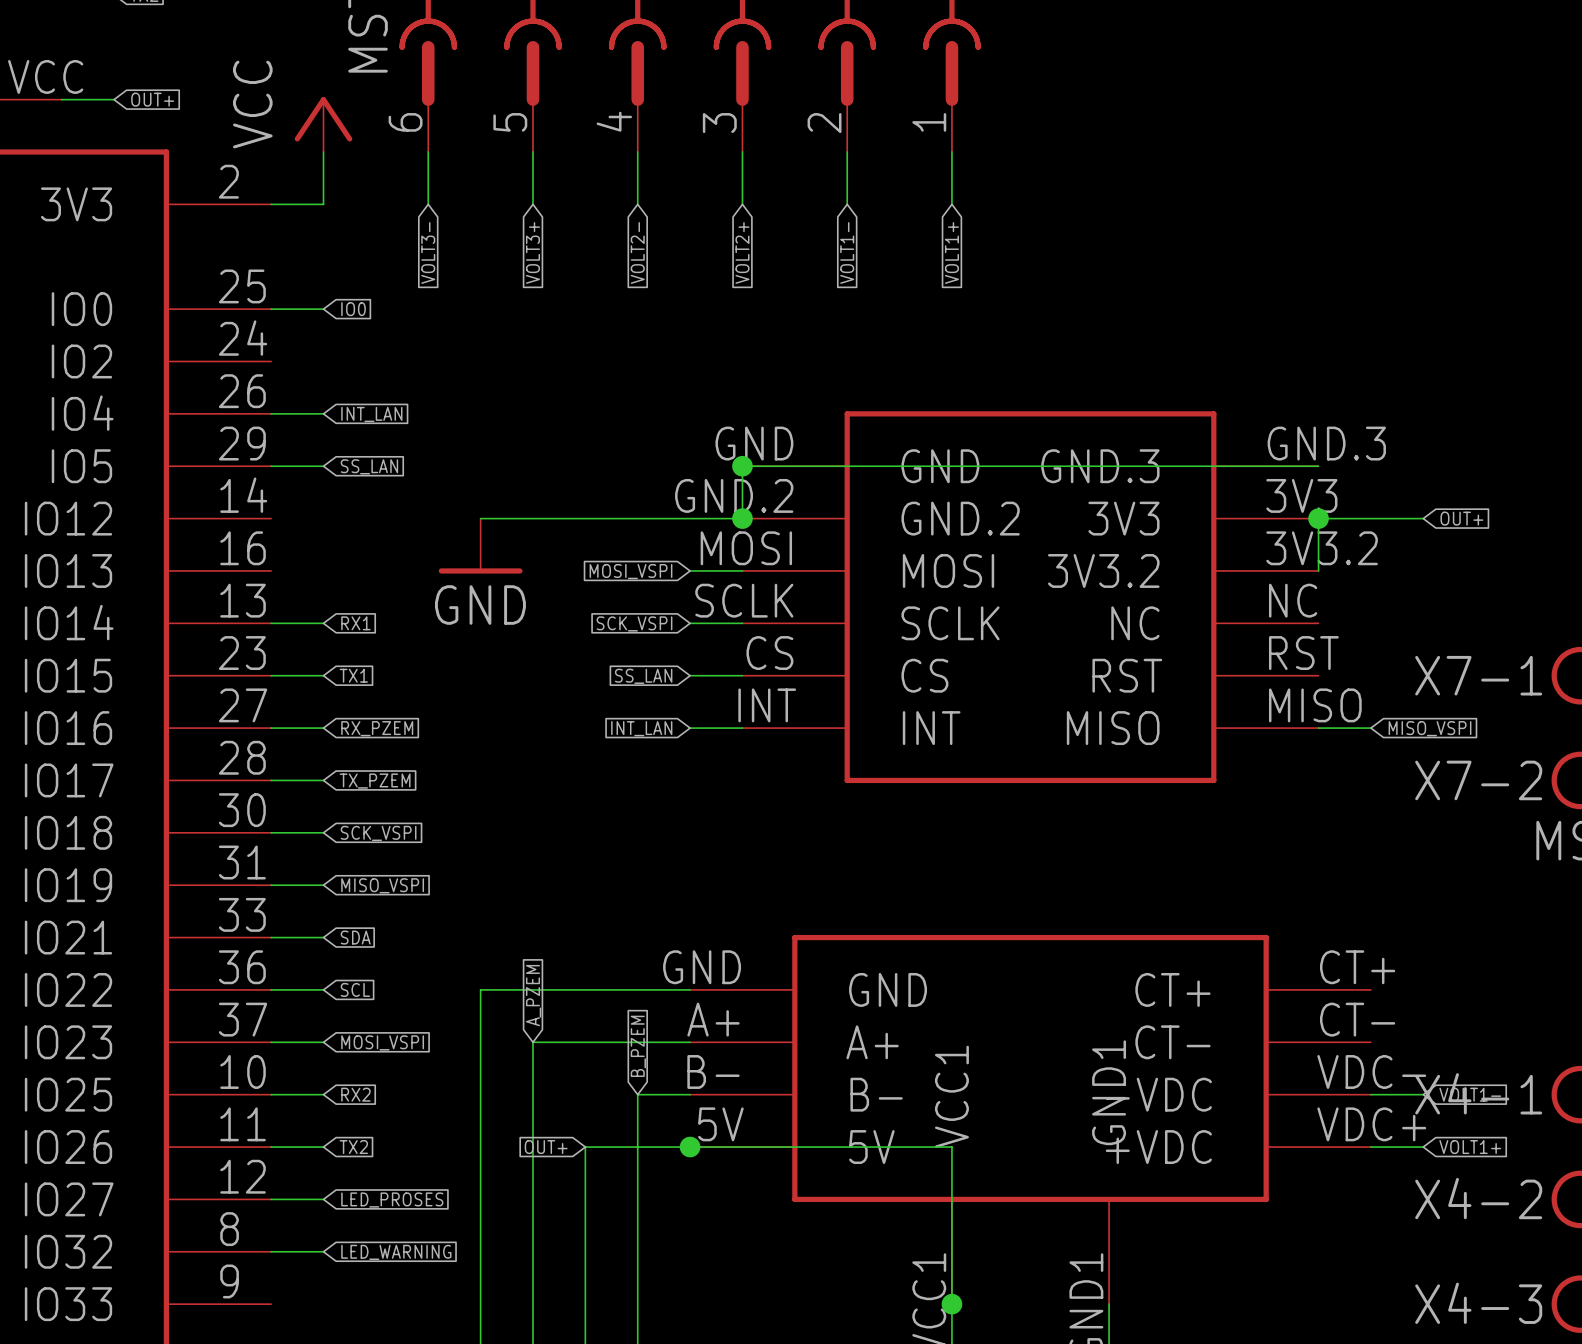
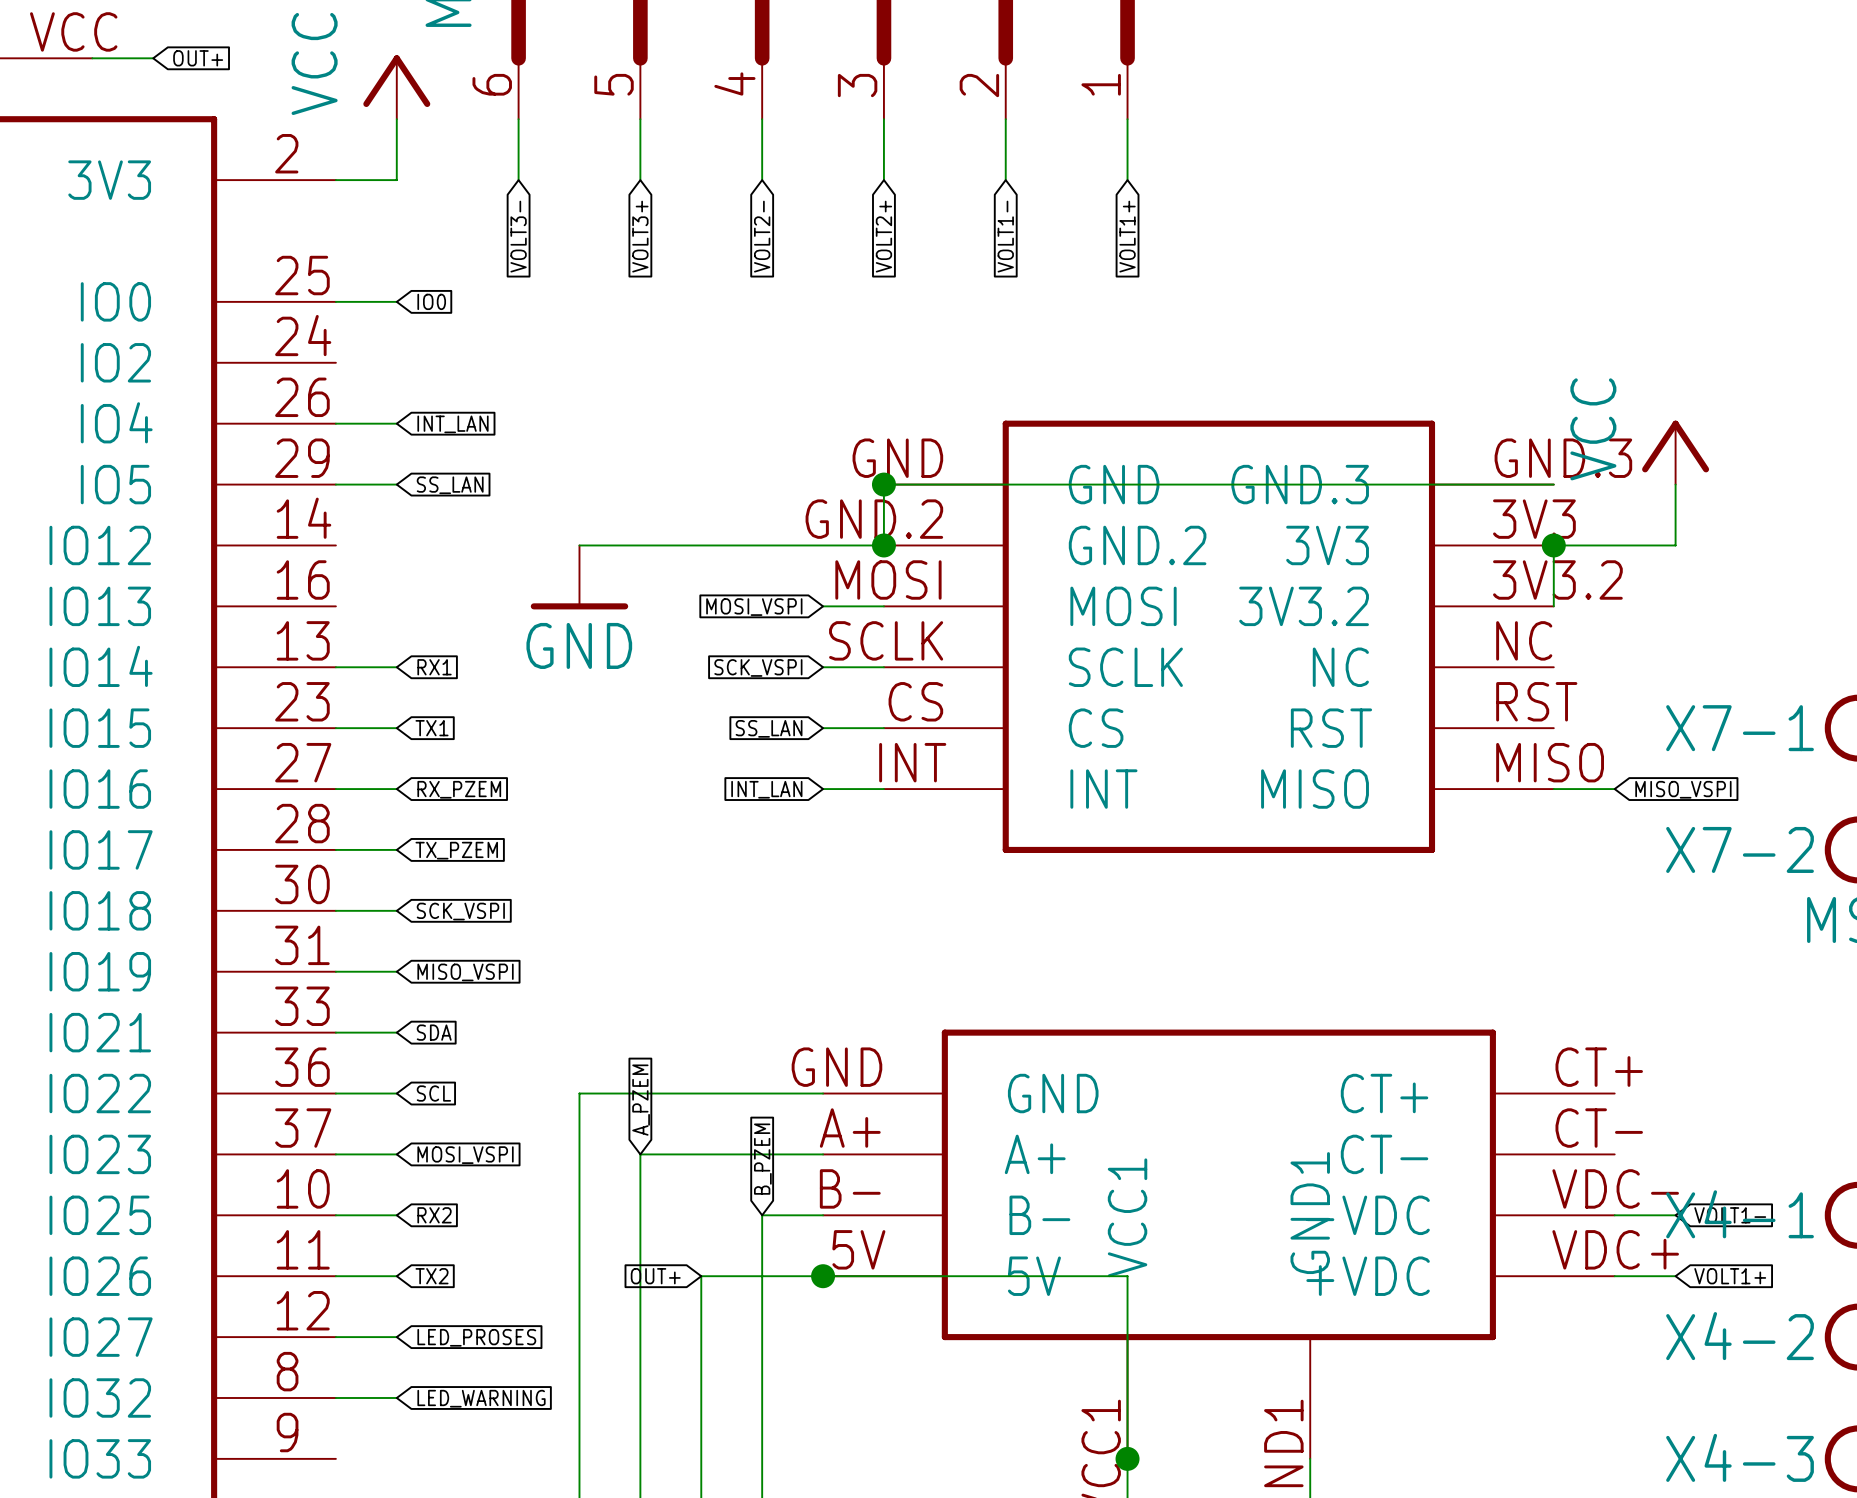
power symbol: none -> VCC (1675, 452)
wire: none -> (1675, 484) (1675, 545)
global label: OUT+ (1461, 518) -> none

